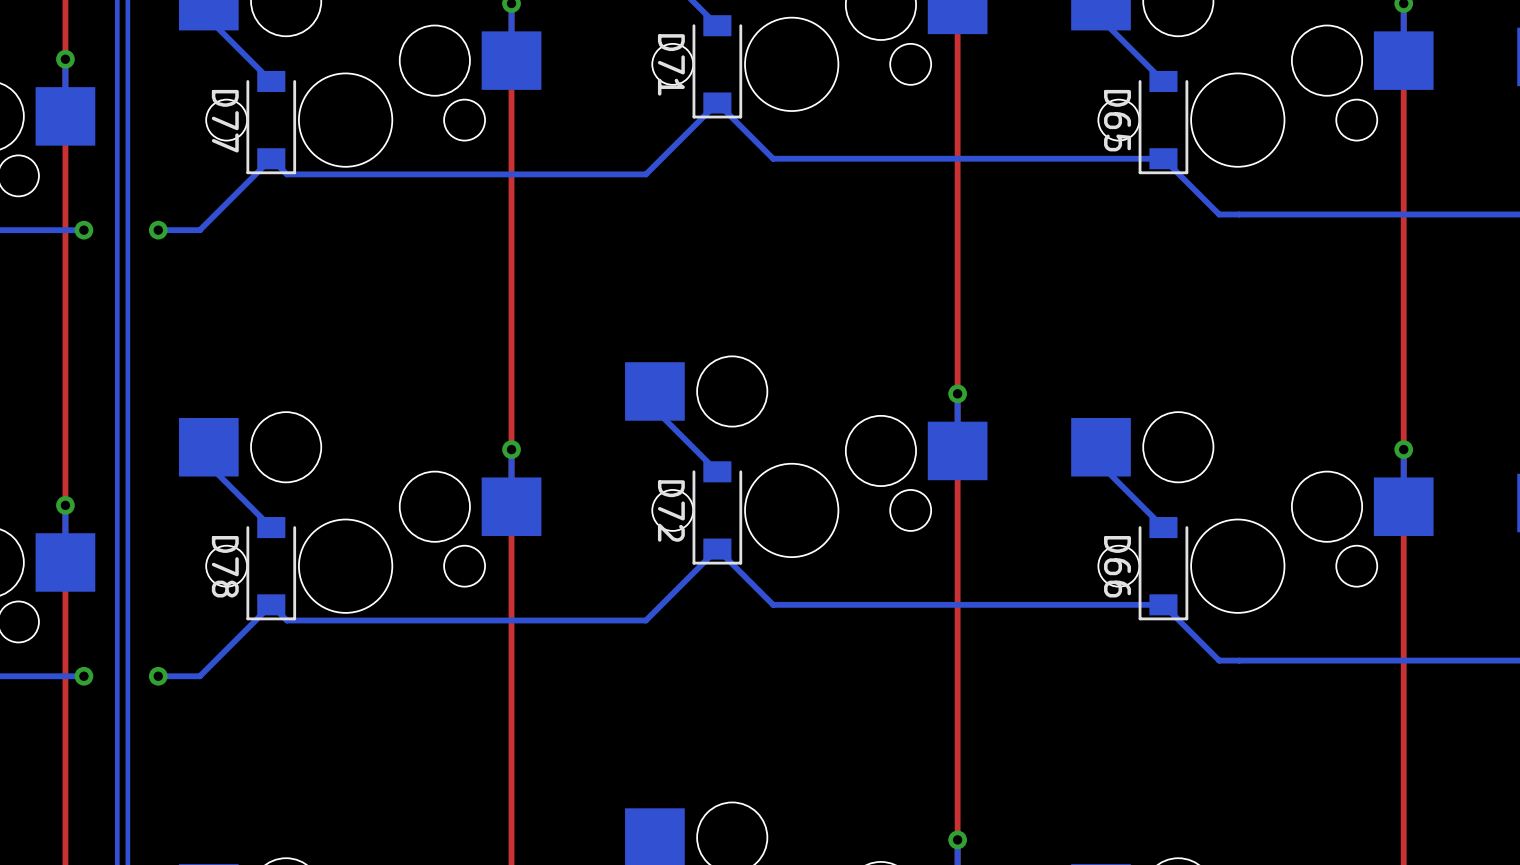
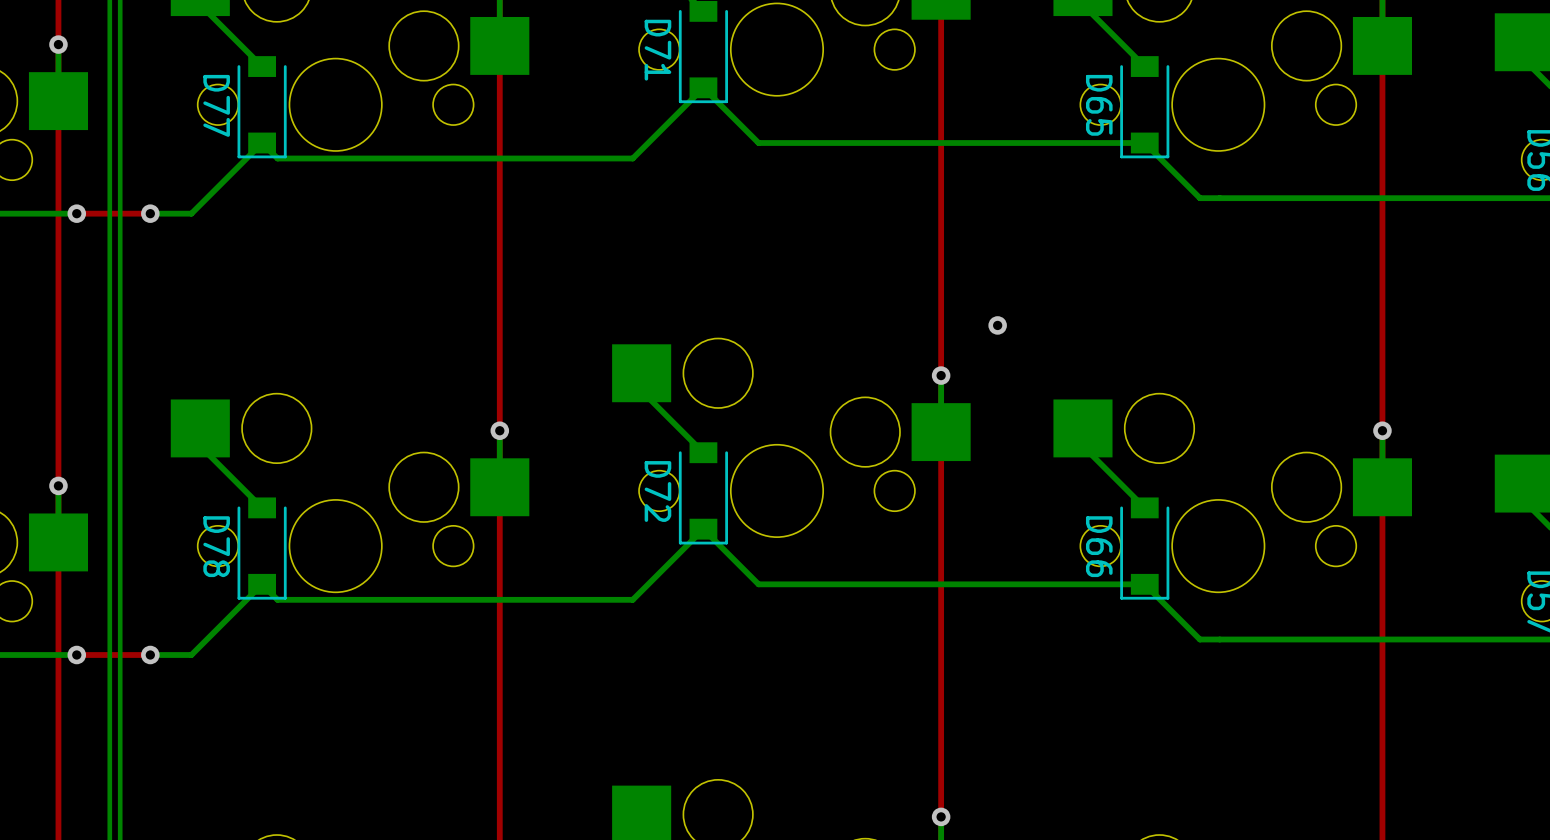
top track: none -> (150, 213) (76, 213)
via: none -> (997, 325)
top track: none -> (151, 654) (76, 654)

